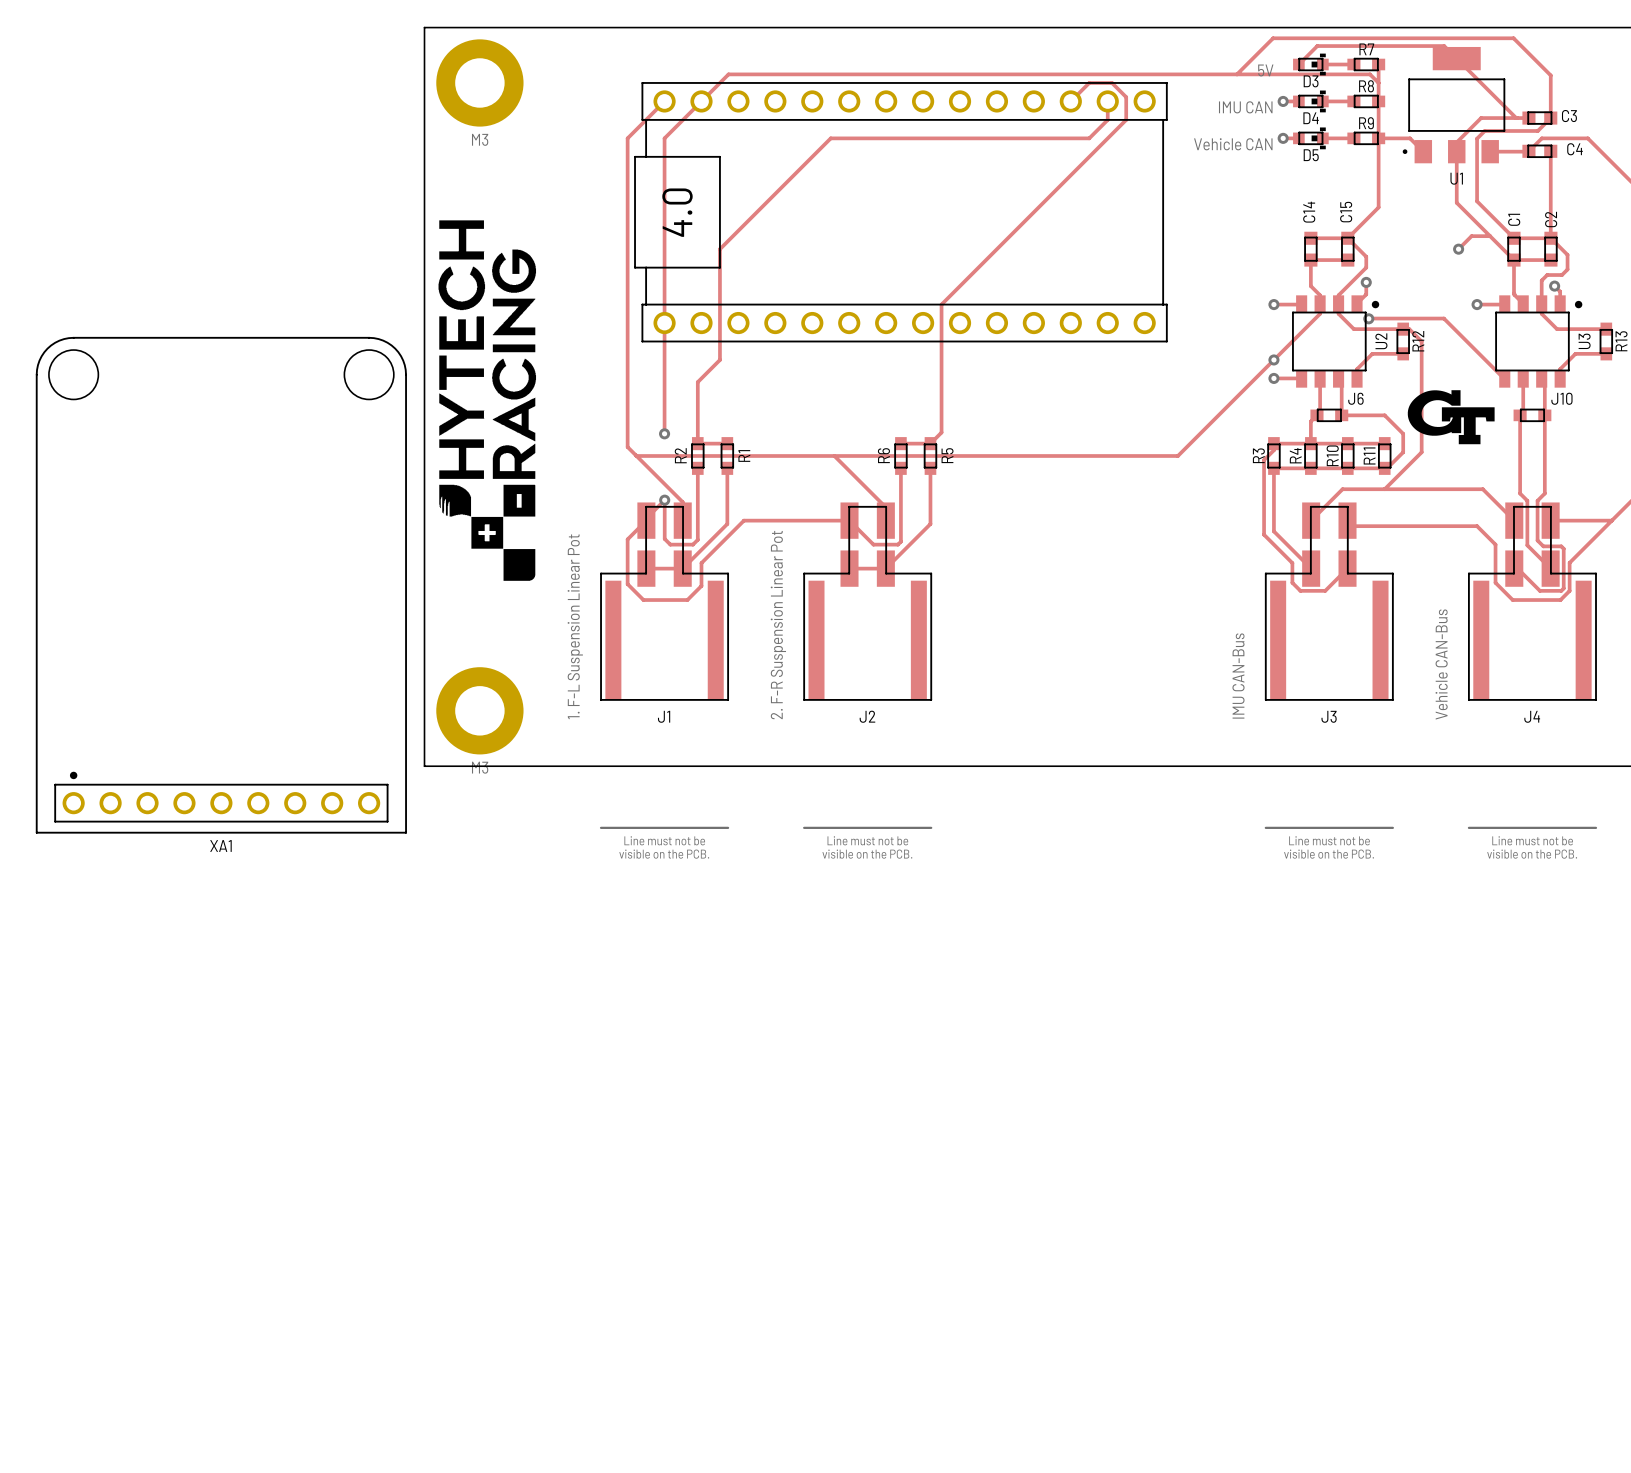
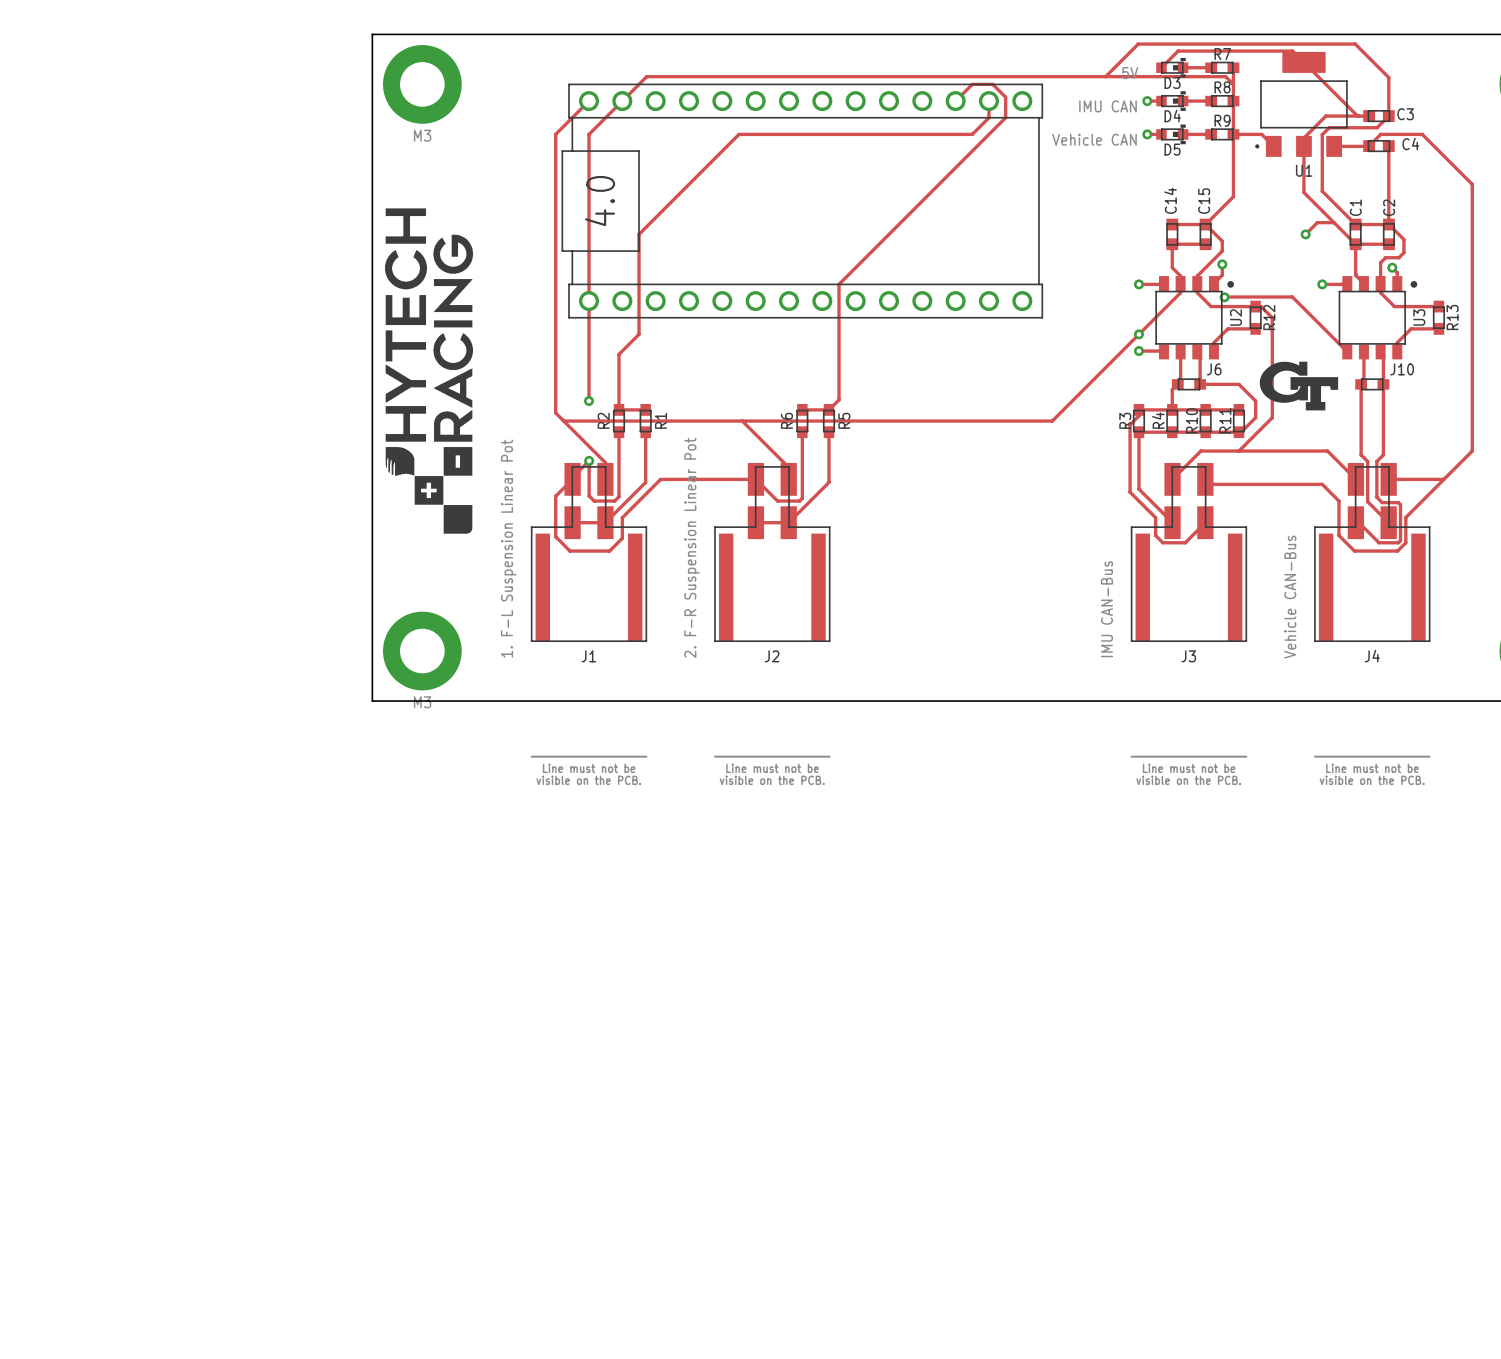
XA1: (221, 585) -> none

